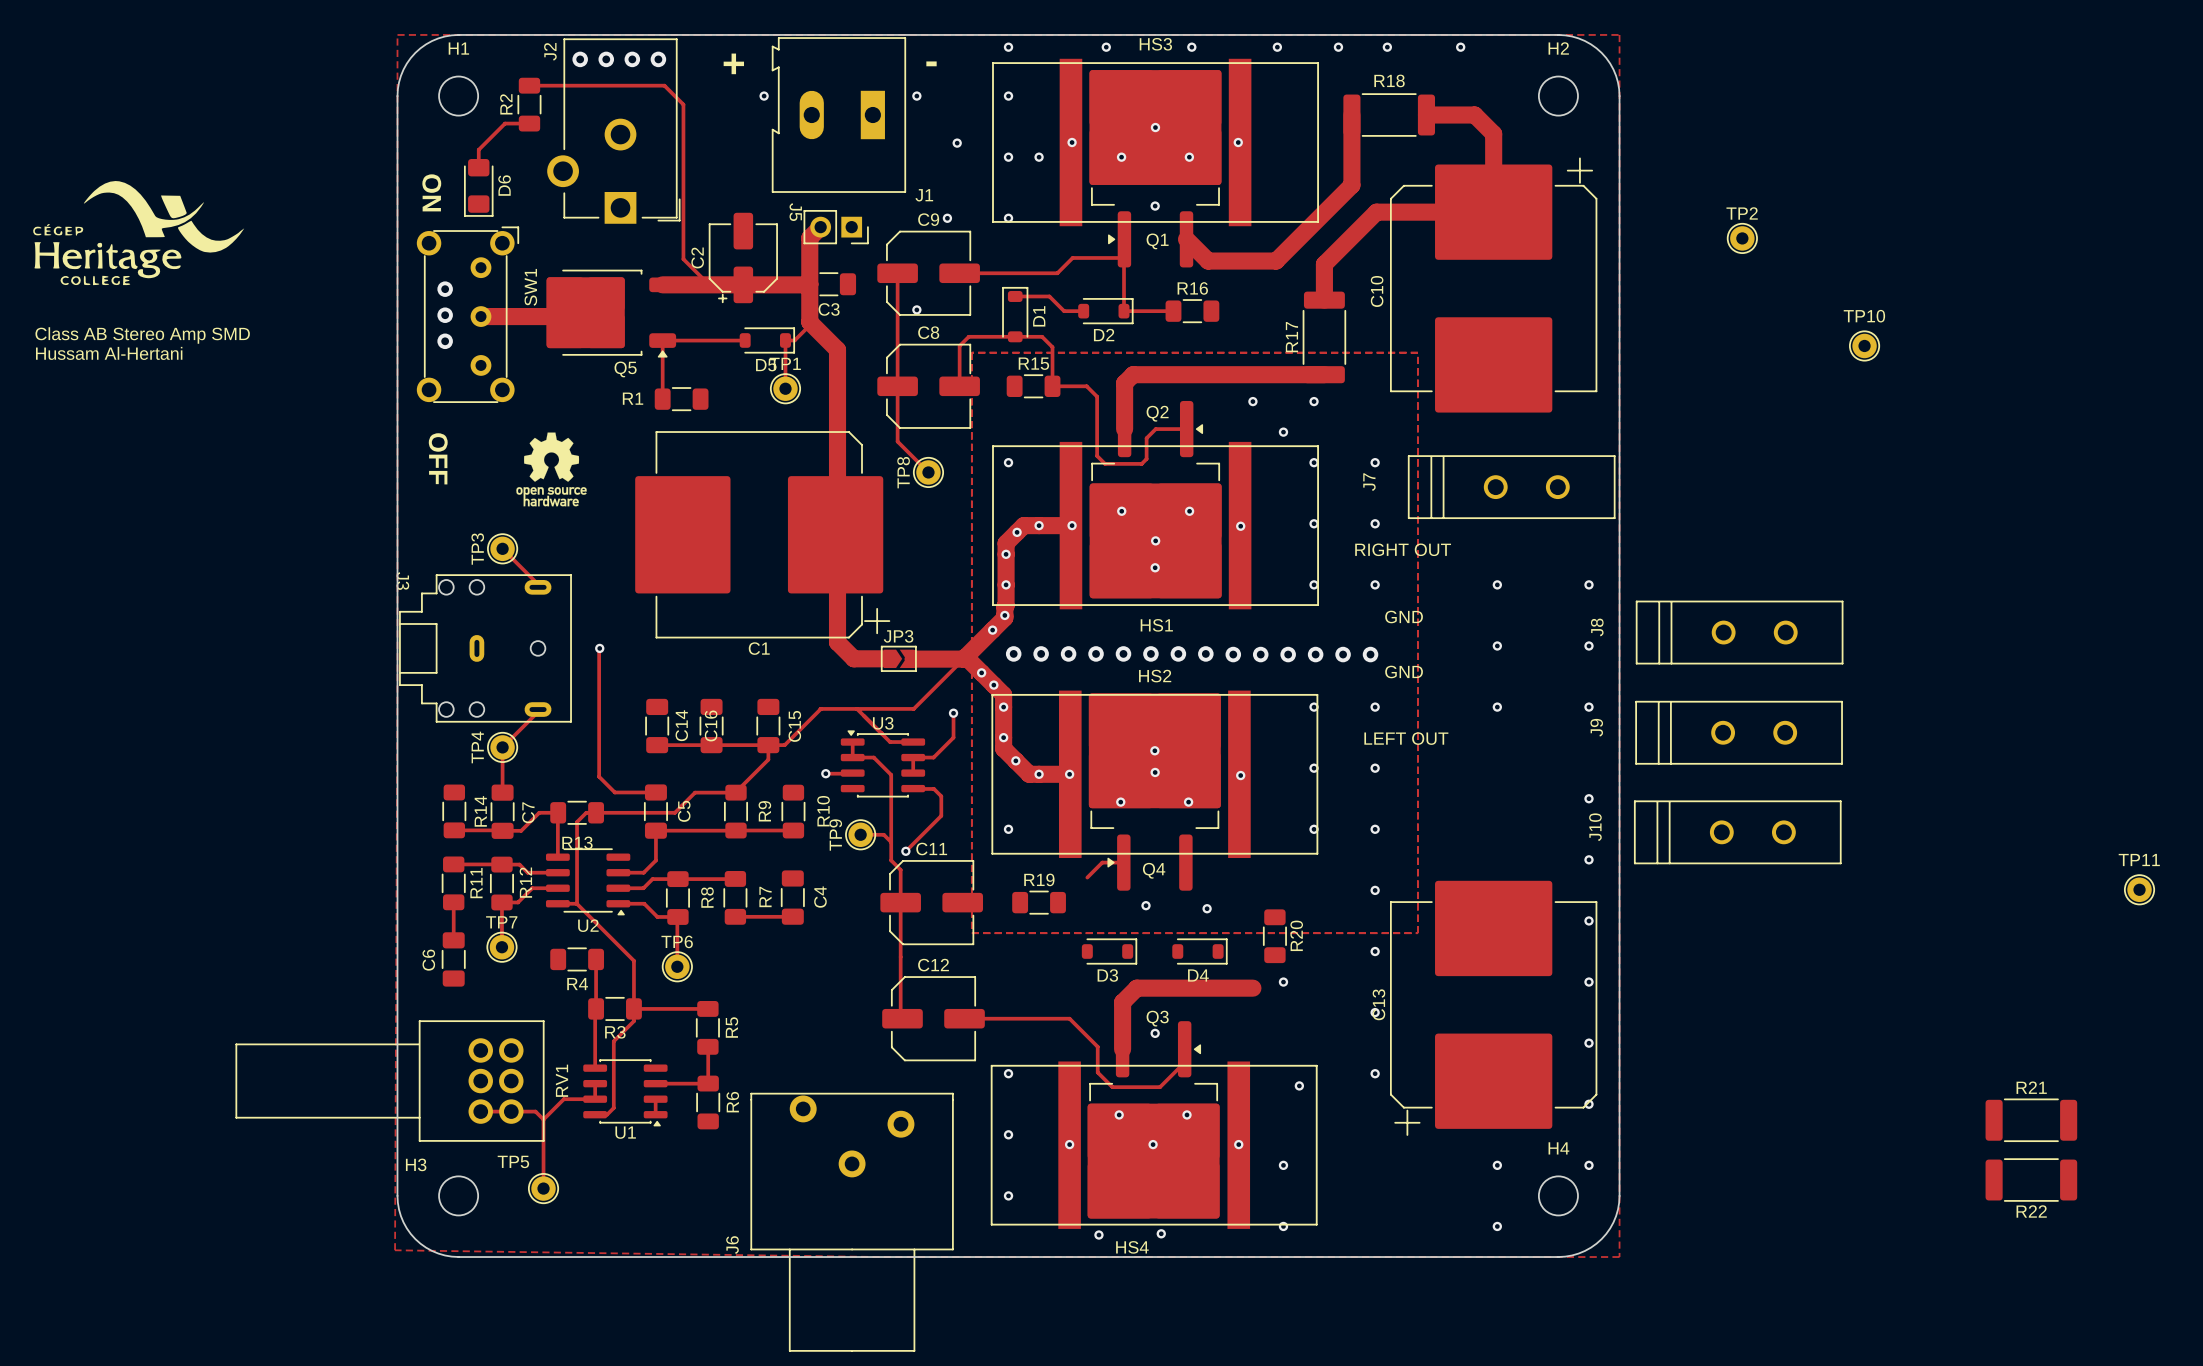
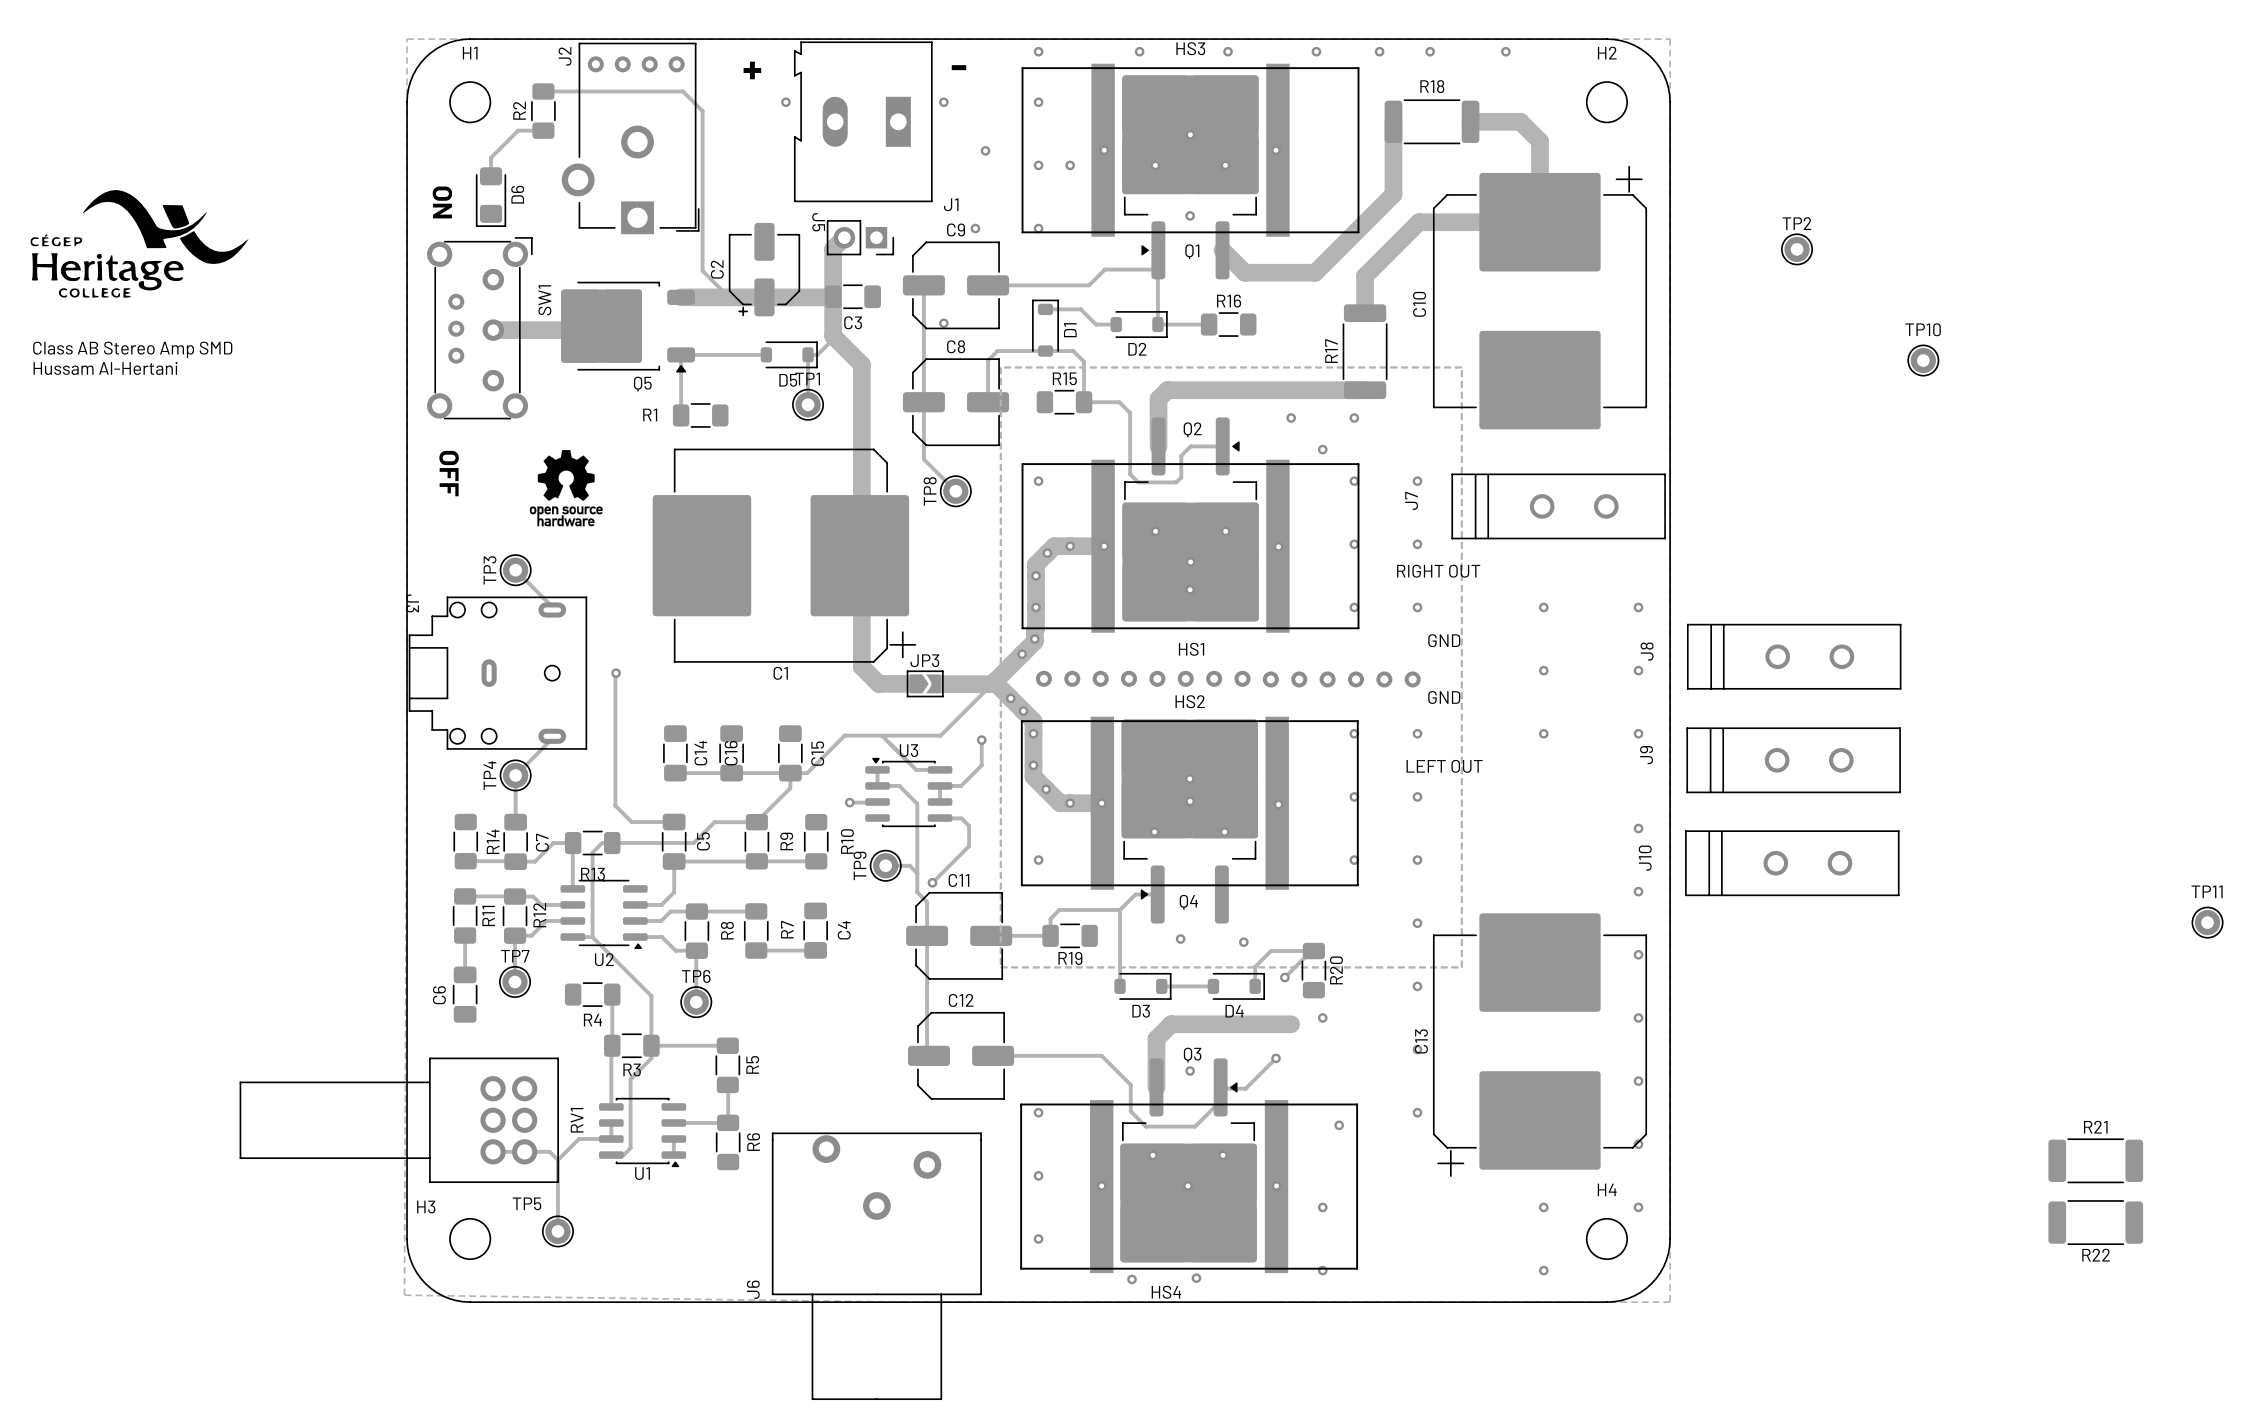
R19 name position: R19 (1039, 879) -> R19 (1070, 958)
track: none -> (991, 935) (1050, 935) (1050, 918) (1059, 909) (1120, 909) (1120, 986)
track: none -> (1284, 977) (1311, 951) (1270, 951) (1255, 966) (1255, 986)
via: none -> (1284, 977)
track: none -> (1161, 986) (1213, 986)
track: none -> (1276, 1058) (1245, 1088) (1221, 1088)
via: none -> (1276, 1058)

